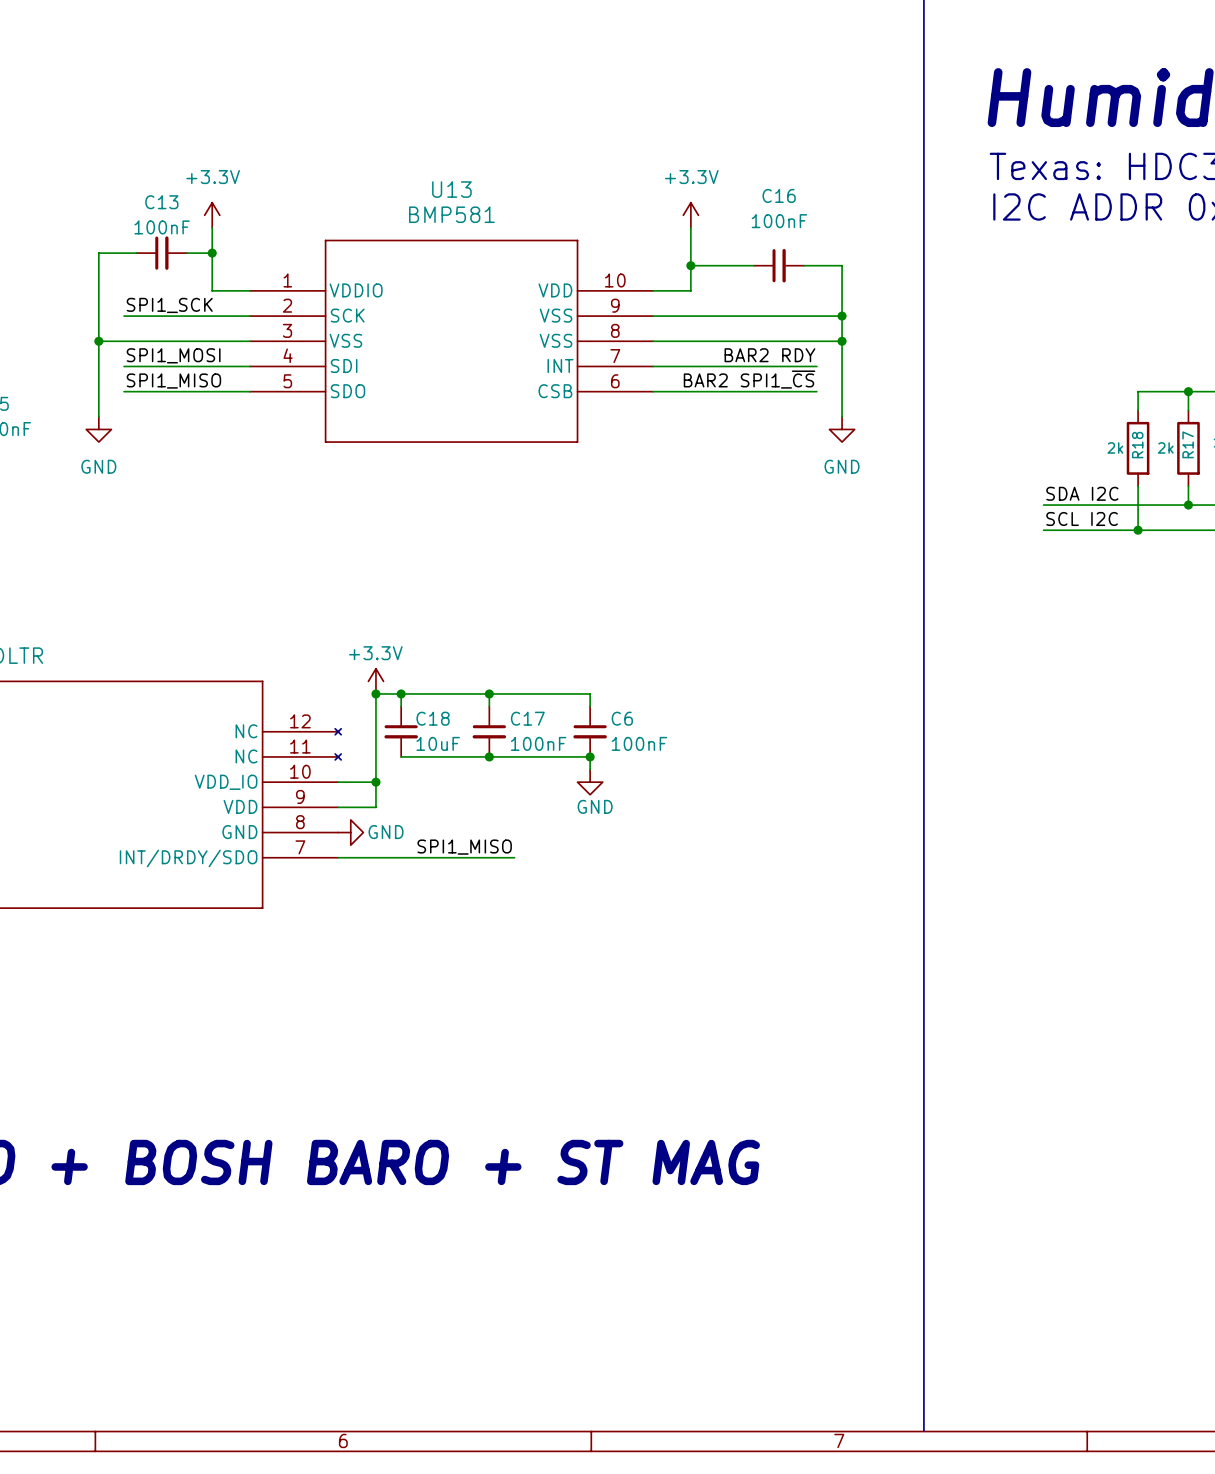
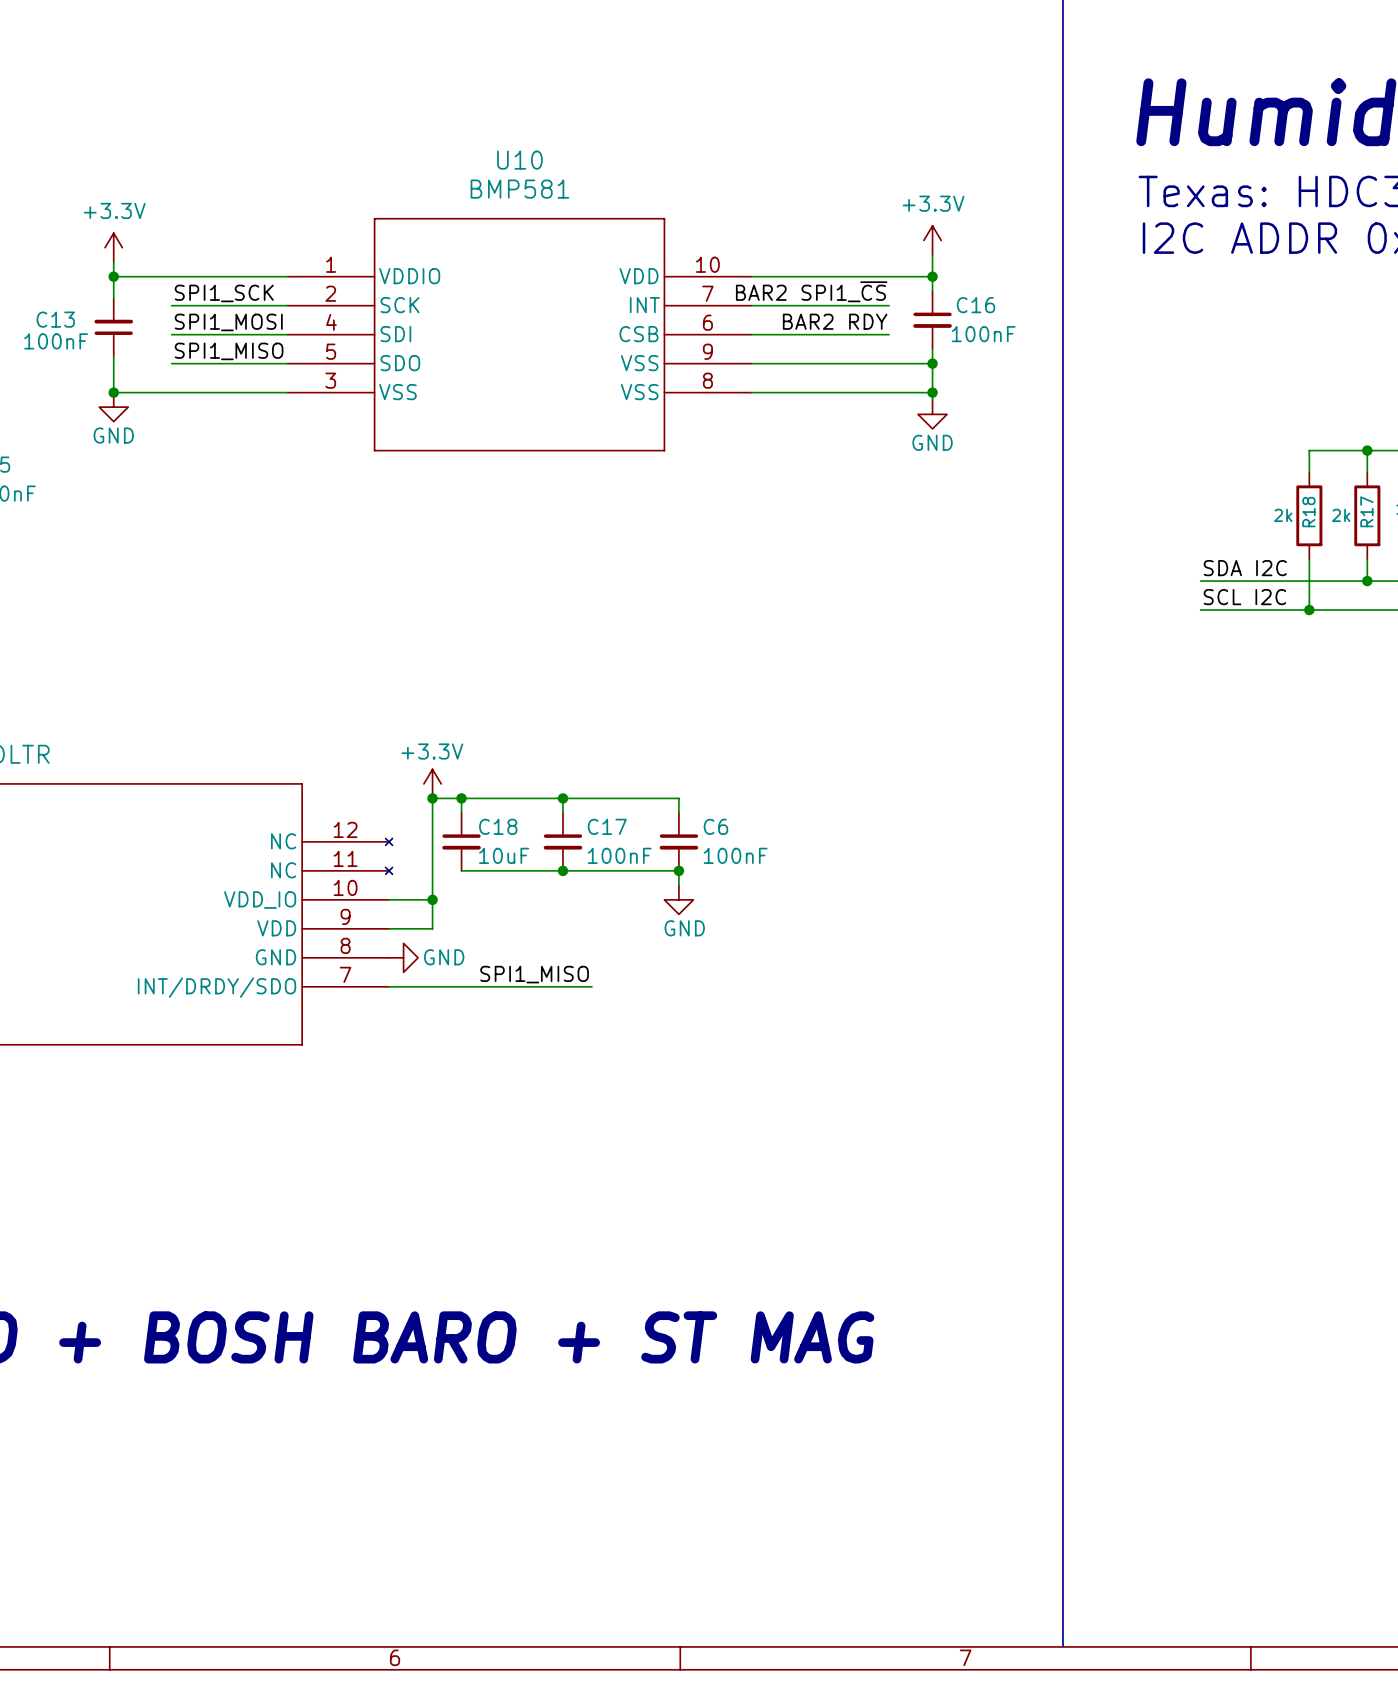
power symbol text position: +3.3V (213, 177) -> +3.3V (114, 210)
power symbol text position: +3.3V (691, 177) -> +3.3V (933, 203)
C16 name position: C16 (779, 195) -> C16 (976, 305)
power symbol position: +3.3V (212, 215) -> +3.3V (113, 247)
power symbol position: +3.3V (690, 215) -> +3.3V (932, 240)
wire: none -> (932, 254) (932, 291)
C13 value position: 100nF (162, 227) -> 100nF (56, 341)
wire: (212, 227) (212, 290) -> (171, 334) (244, 334)
wire: (690, 227) (690, 290) -> (889, 334) (794, 334)
wire: none -> (113, 276) (287, 276)
junction: none -> (113, 276)
wire: none -> (751, 276) (932, 276)
junction: none -> (932, 276)
wire: (98, 253) (136, 253) -> (113, 291) (113, 262)
C13 rotation: 0° (161, 253) -> 90° counterclockwise (113, 327)
C13 position: (161, 253) -> (113, 327)
wire: (187, 253) (212, 253) -> none
junction: (212, 253) -> none
wire: none -> (171, 305) (287, 305)
wire: none -> (751, 305) (794, 305)
junction: (690, 265) -> none
C16 rotation: 0° (779, 265) -> 90° clockwise (932, 320)
C16 position: (779, 265) -> (932, 320)
wire: (804, 265) (842, 265) (842, 416) -> none
U10: none -> BMP581 (519, 334)
wire: none -> (932, 349) (932, 399)
label position: SPI1_SCK (169, 305) -> SPI1_SCK (224, 293)
wire: (124, 316) (149, 316) -> none
wire: (810, 316) (842, 316) -> none
junction: none -> (932, 363)
junction: (842, 316) -> none
wire: (98, 341) (98, 416) -> none
U13: BMP581 (451, 341) -> none
wire: (810, 341) (842, 341) -> none
junction: none -> (932, 392)
junction: (842, 341) -> none
label position: SPI1_MOSI (173, 355) -> SPI1_MOSI (228, 322)
label position: BAR2 RDY (769, 355) -> BAR2 RDY (835, 321)
wire: (124, 366) (250, 366) -> none
wire: (653, 366) (816, 366) -> none
label position: BAR2 SPI1_~{CS} (749, 379) -> BAR2 SPI1_~{CS} (811, 291)
label position: SPI1_MISO (173, 381) -> SPI1_MISO (229, 351)
wire: (124, 391) (250, 391) -> none
wire: (653, 391) (816, 391) -> none
power symbol position: GND (98, 429) -> GND (113, 407)
power symbol position: GND (842, 429) -> GND (932, 414)
power symbol text position: GND (98, 466) -> GND (113, 435)
power symbol text position: GND (842, 466) -> GND (932, 442)

